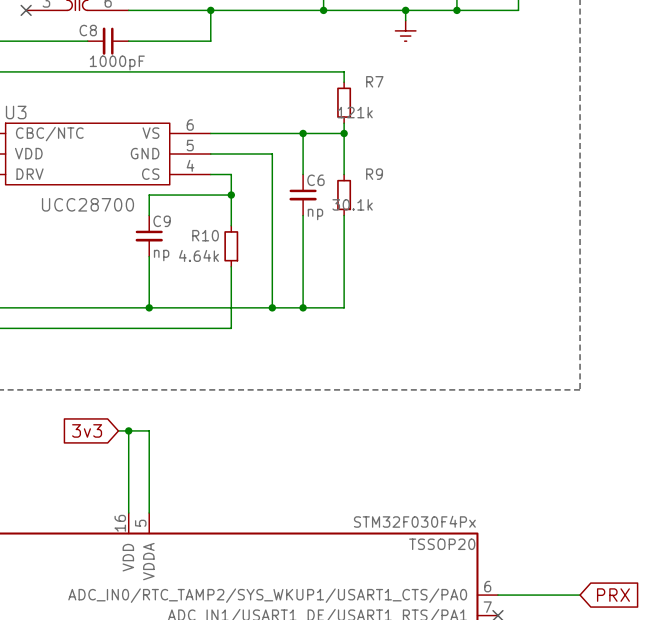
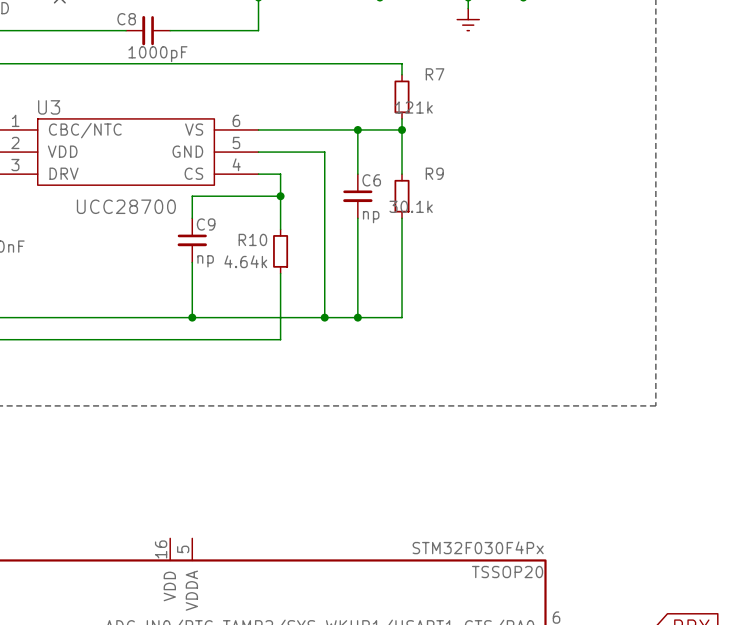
global label: 3v3 (87, 430) -> none
wire: (118, 430) (149, 430) (149, 513) -> none
wire: (128, 430) (128, 513) -> none
junction: (128, 430) -> none

